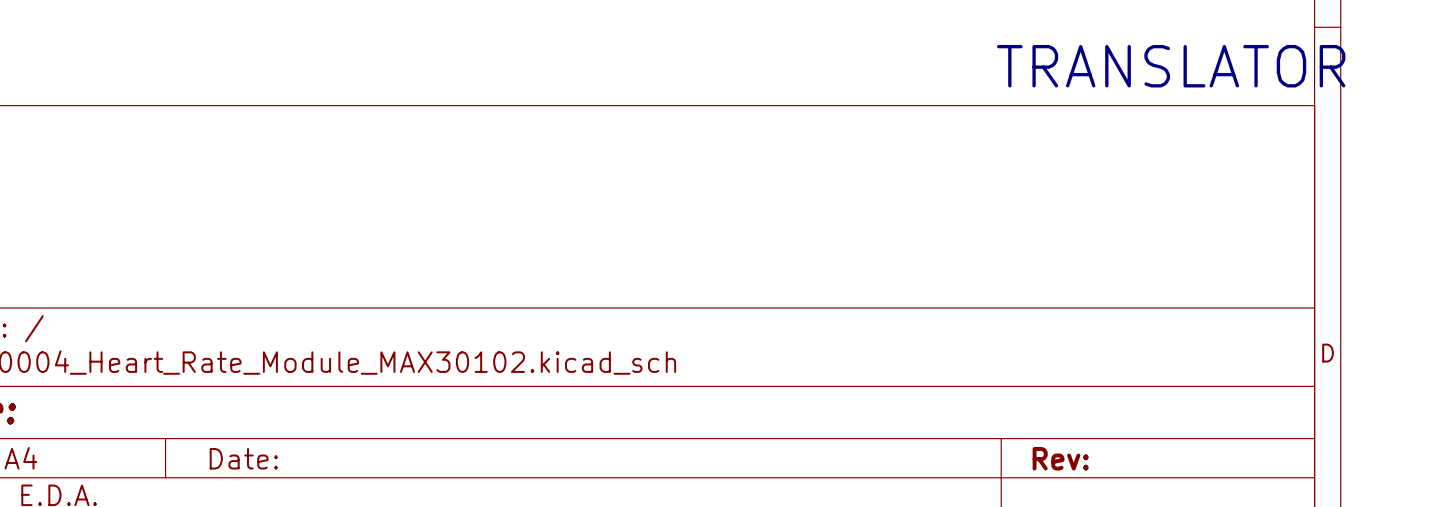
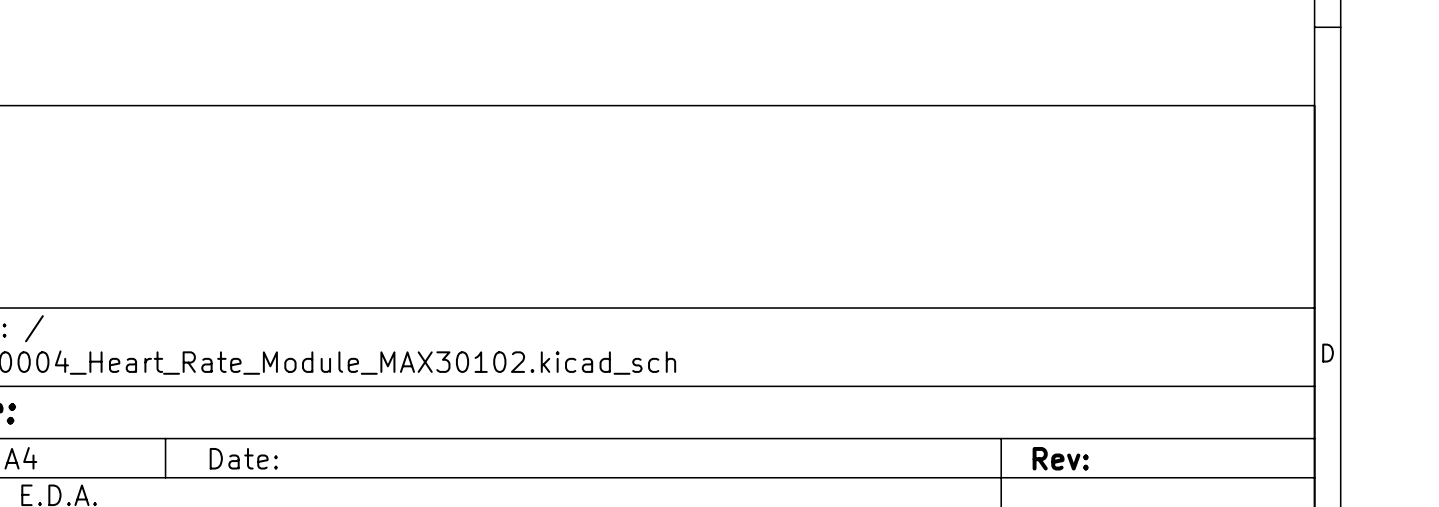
text: TRANSLATOR (1171, 66) -> none

